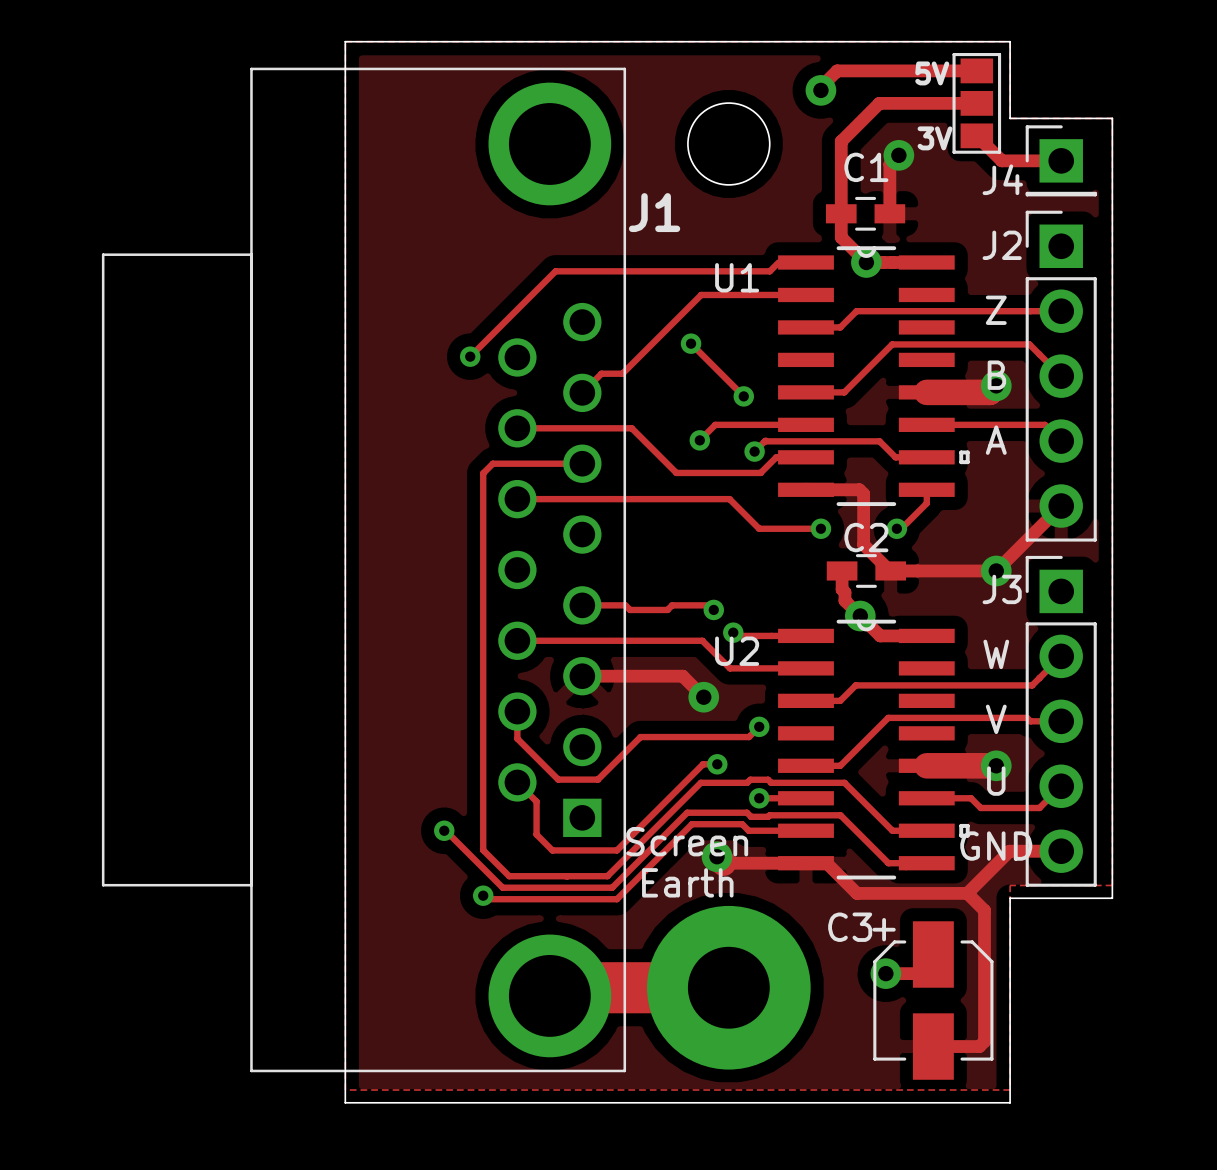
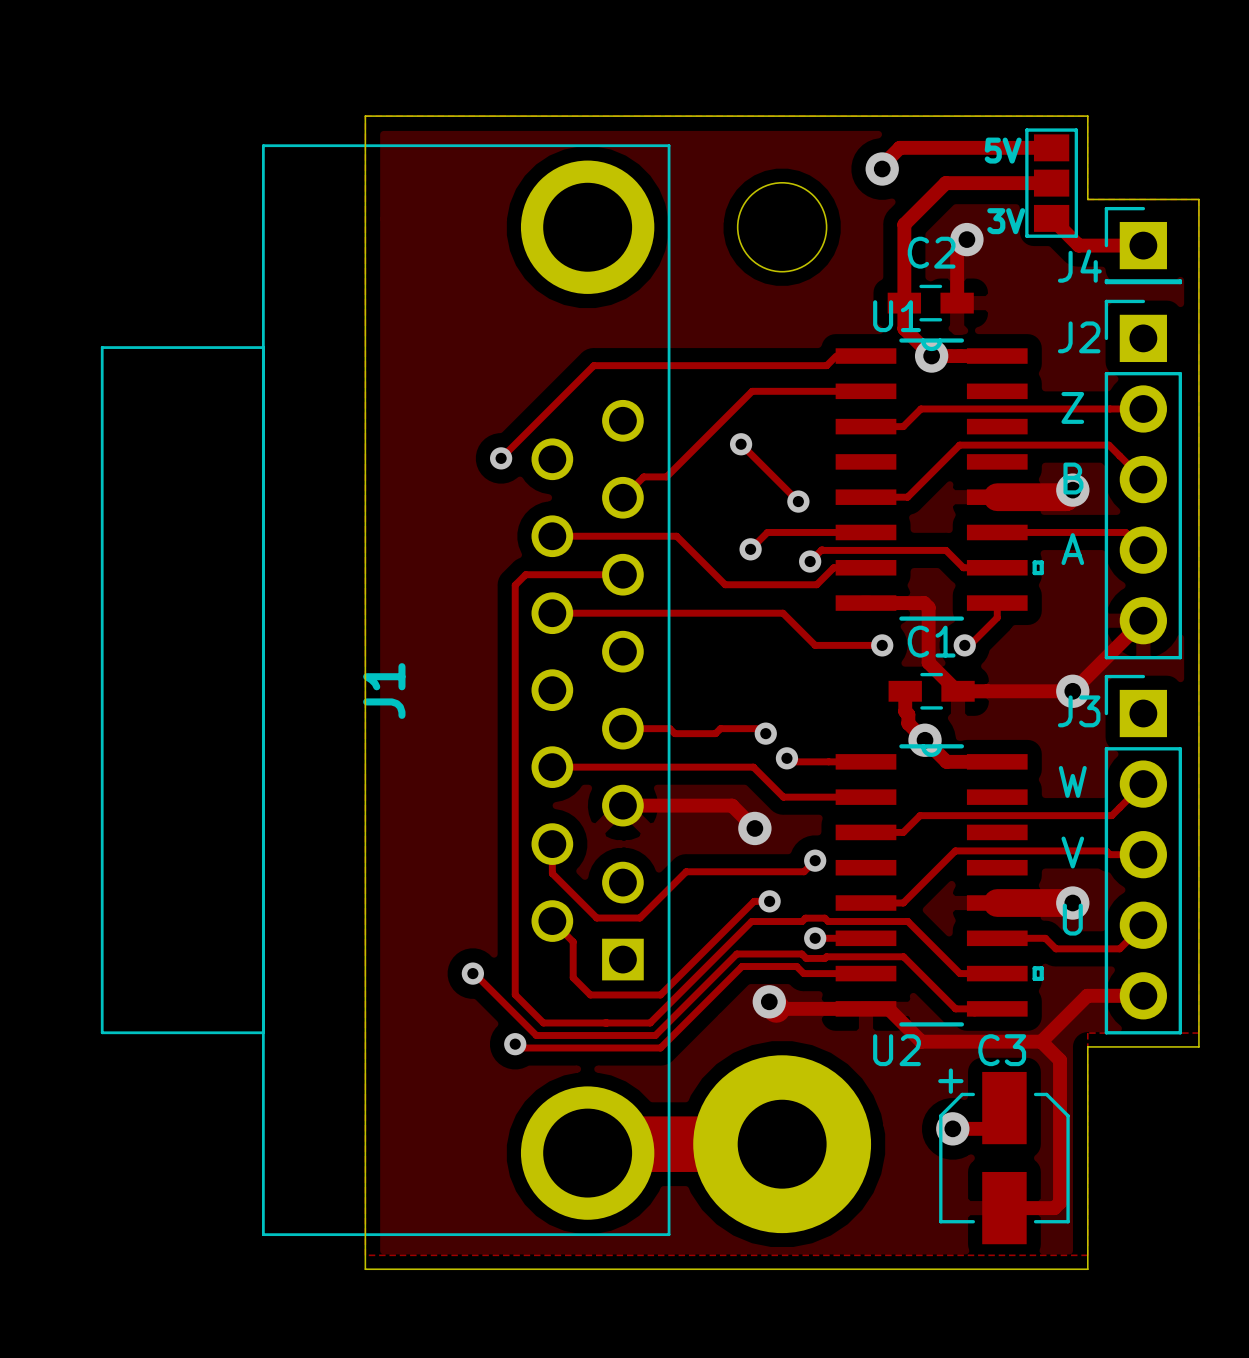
C1 name: C1 (866, 167) -> C2 (931, 252)
J1 name rotation: 0° (654, 212) -> 90° counterclockwise (384, 691)
J1 name position: J1 (654, 212) -> J1 (384, 691)
U1 name position: U1 (737, 277) -> U1 (897, 316)
C2 name: C2 (866, 537) -> C1 (931, 641)
U2 name position: U2 (737, 651) -> U2 (897, 1050)
text: Screen (687, 841) -> none
text: GND (996, 846) -> none
text: Earth (687, 882) -> none
C3 name position: C3 (850, 927) -> C3 (1002, 1050)

